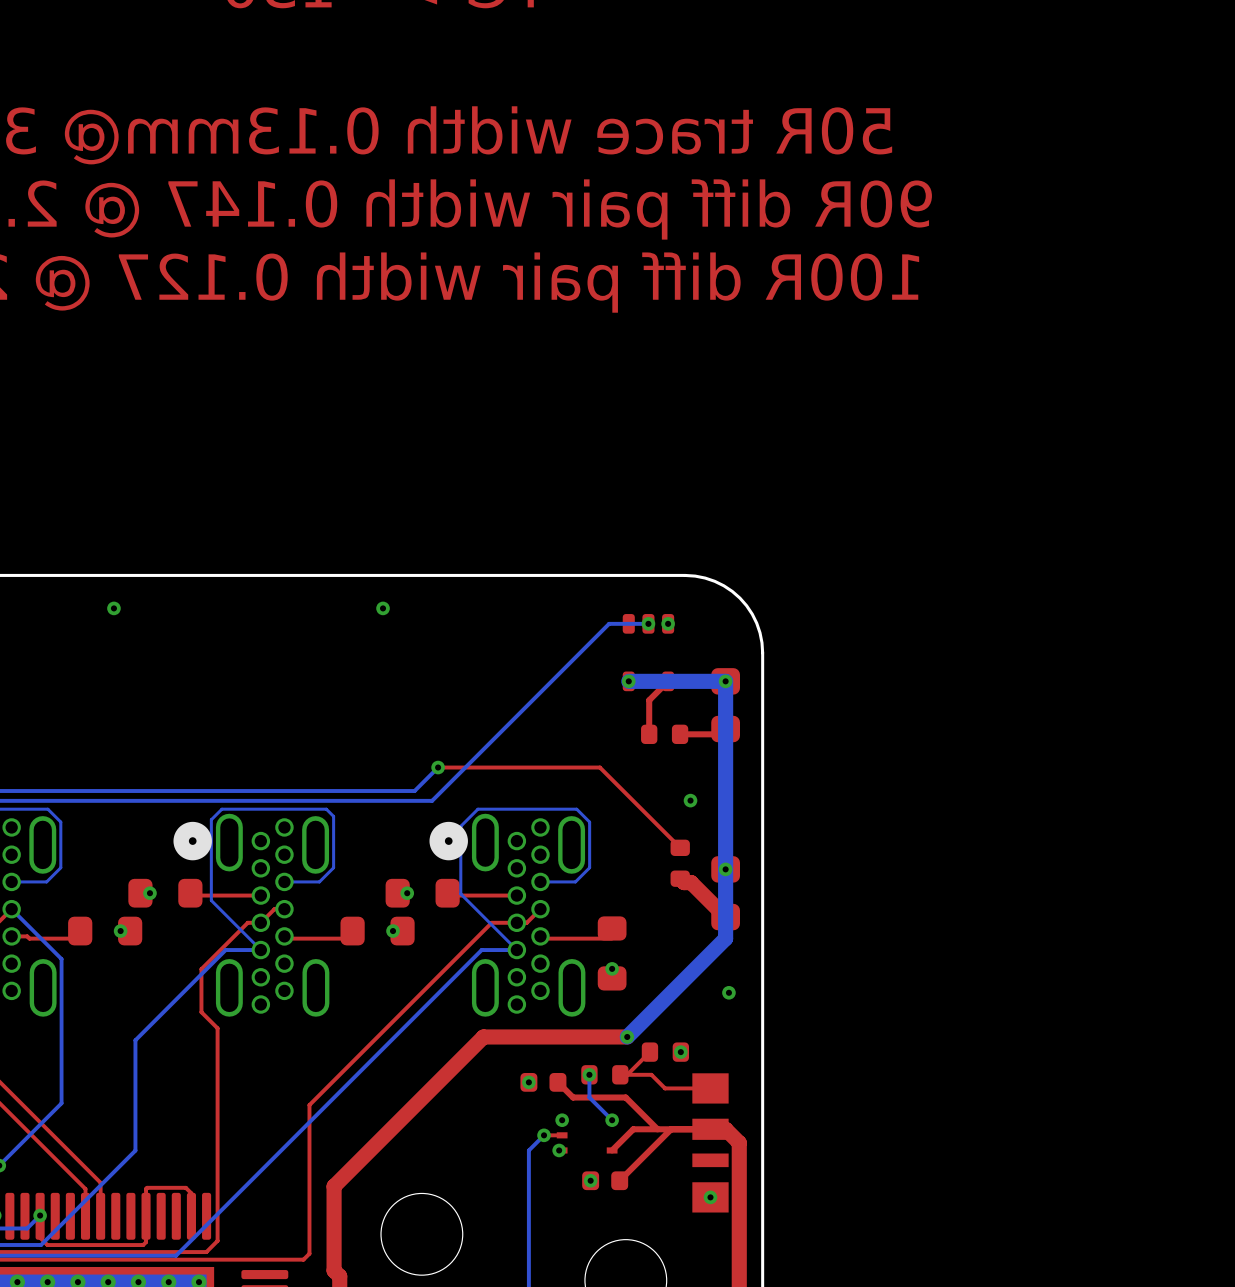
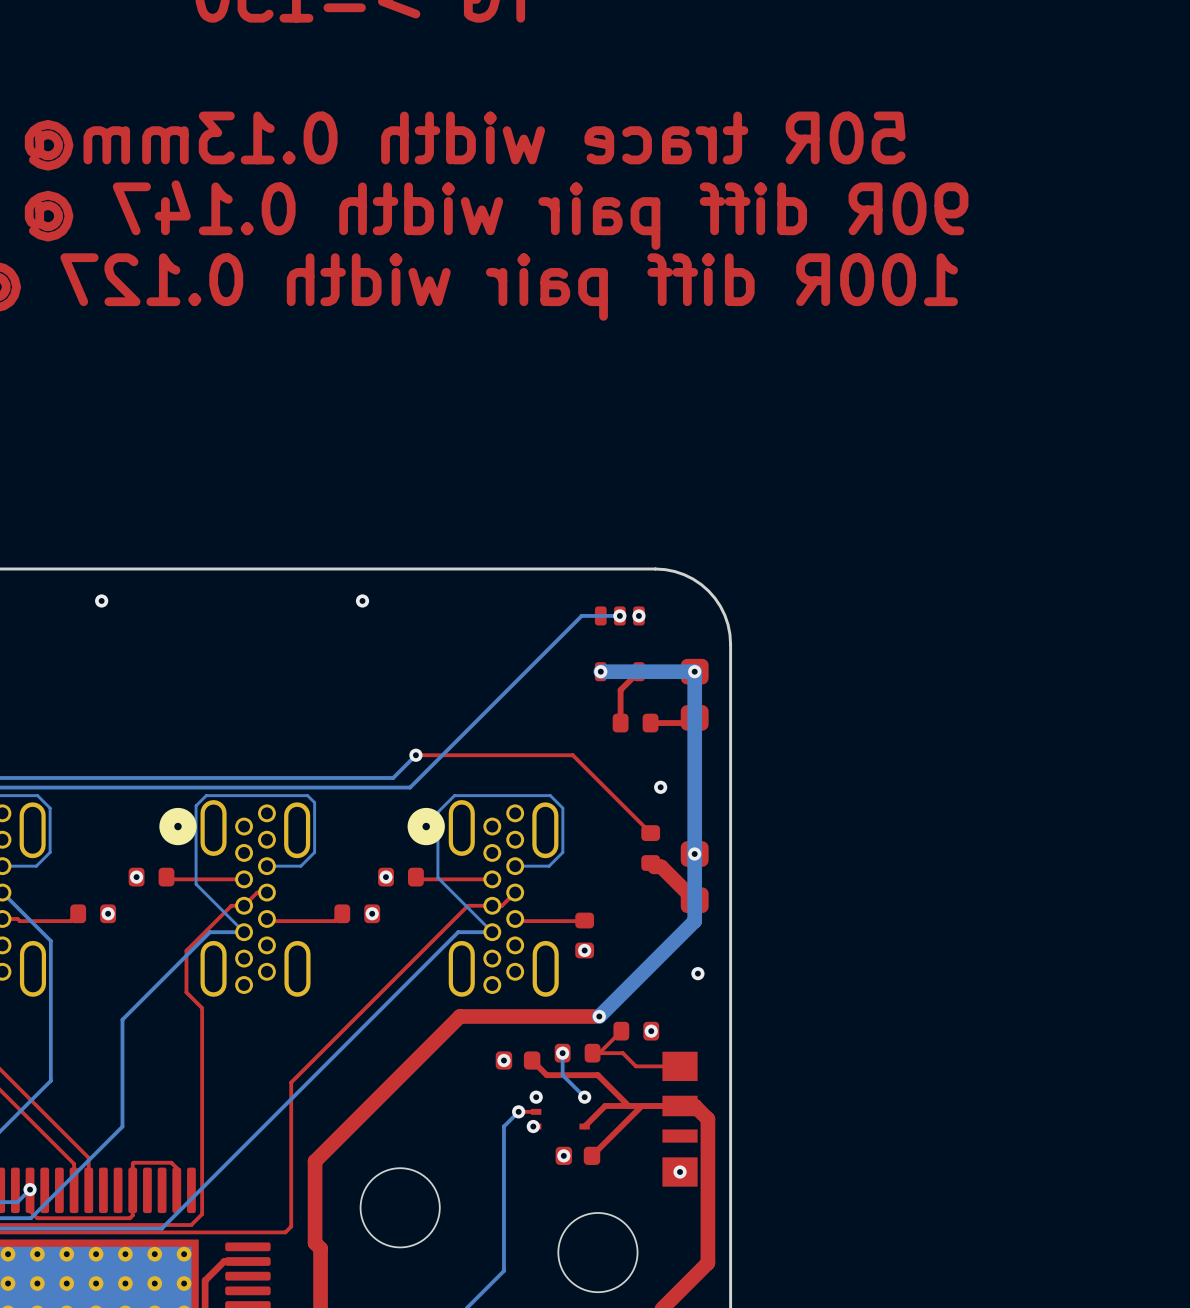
part footprint: [128, 878, 203, 908] -> [128, 867, 175, 887]
part footprint: [385, 878, 460, 908] -> [378, 867, 424, 887]
part footprint: [68, 916, 143, 946] -> [70, 904, 117, 924]
part footprint: [340, 916, 415, 946] -> [334, 904, 381, 924]
part footprint: [597, 916, 627, 991] -> [575, 912, 595, 959]

